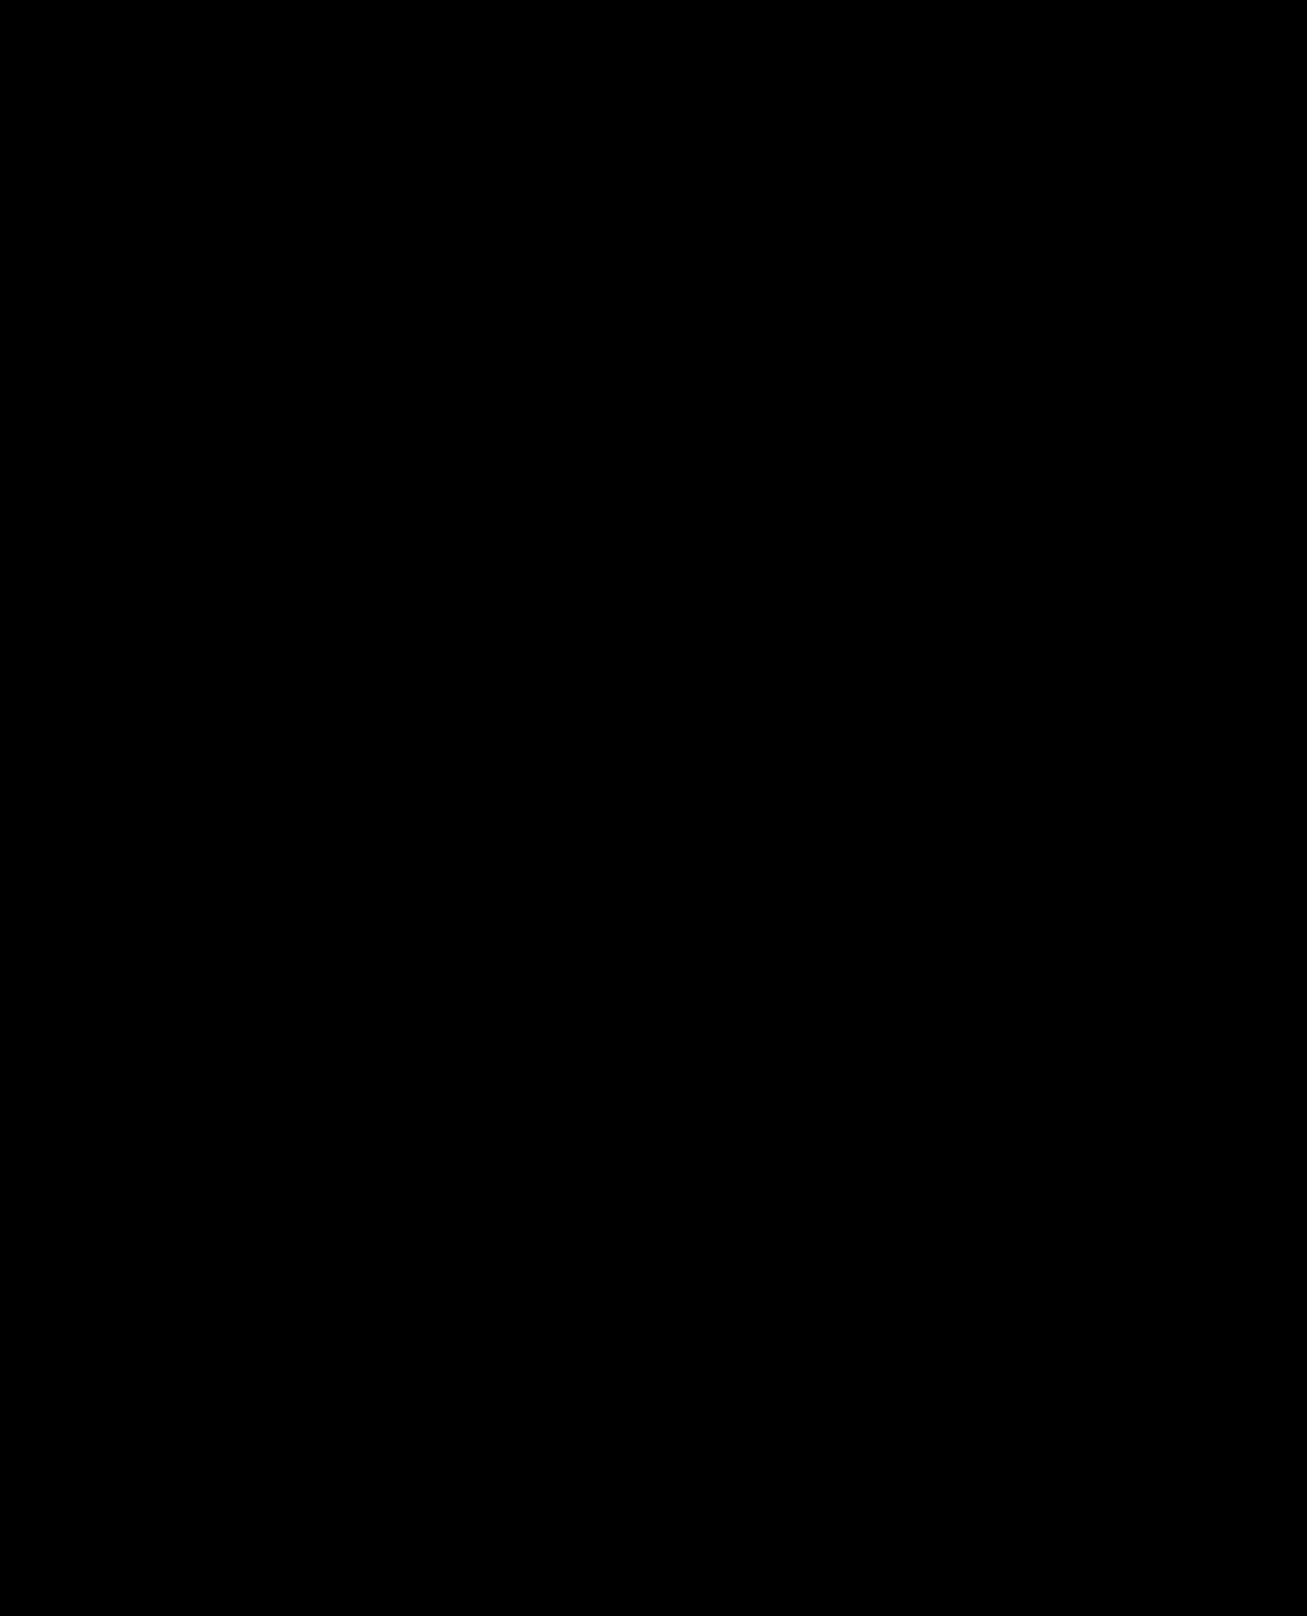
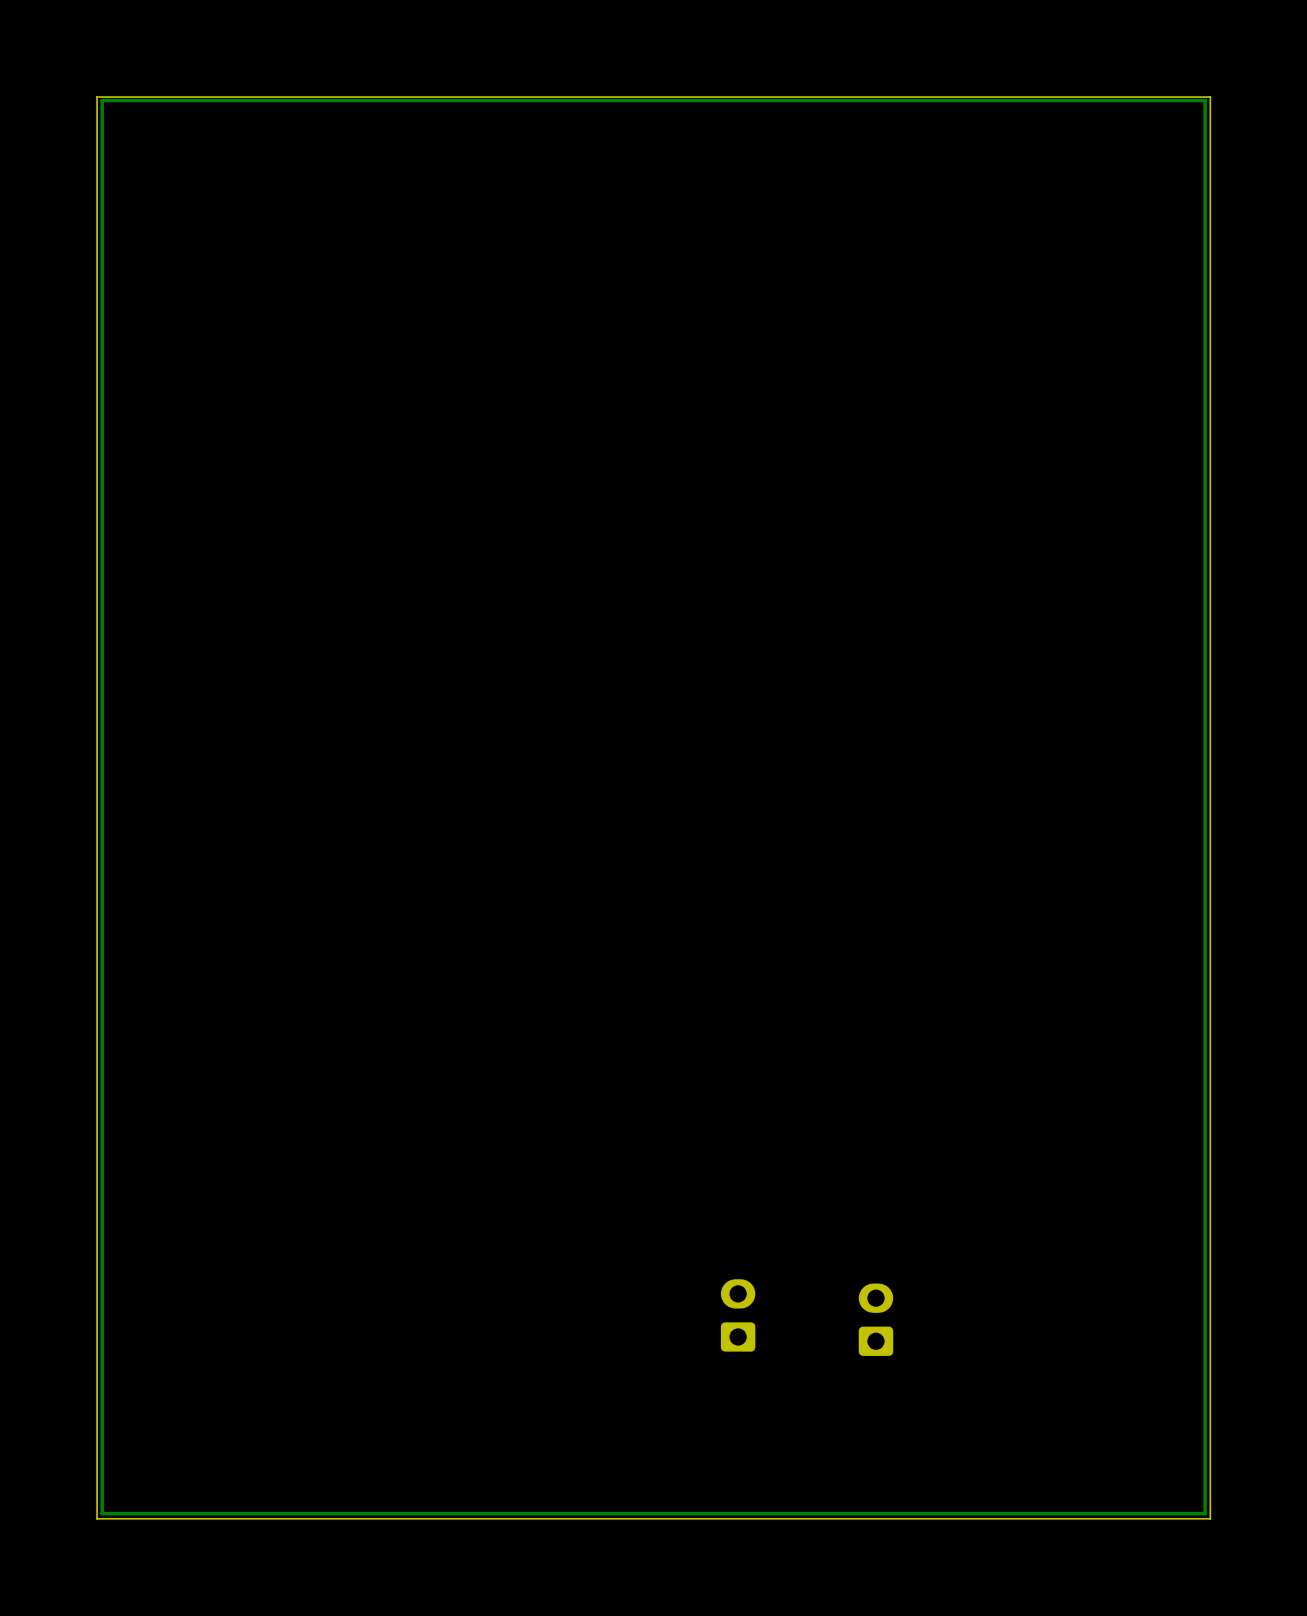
board edge: none -> (1210, 97) (97, 97) (97, 1518) (1210, 1518) (1210, 97)
bottom track: none -> (1205, 100) (102, 100) (102, 1513) (1205, 1513) (1205, 100)
part: none -> (738, 1315)
part: none -> (875, 1319)

